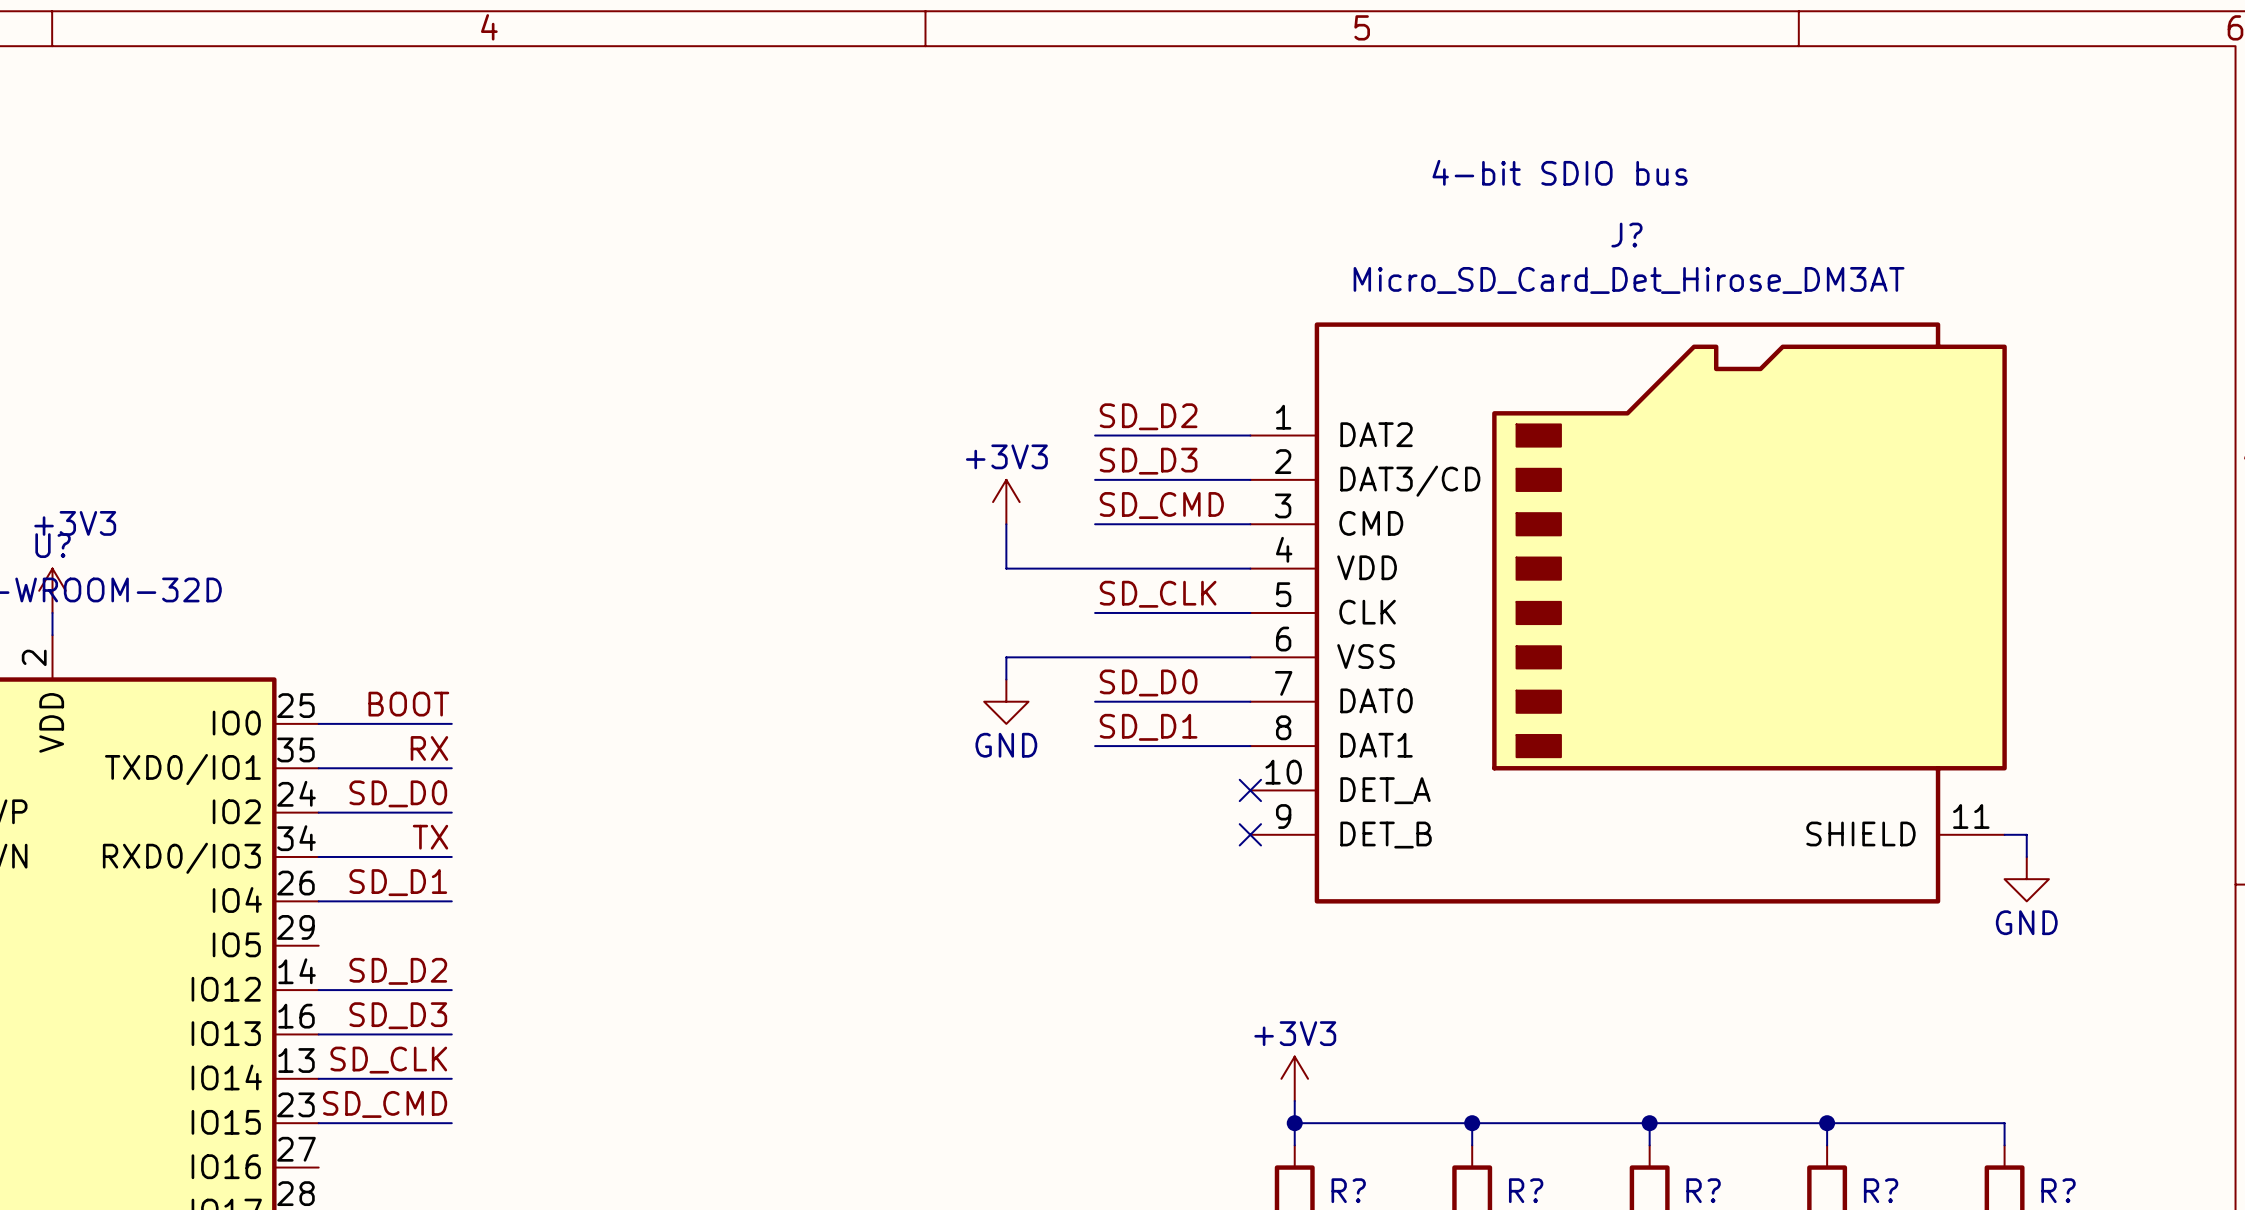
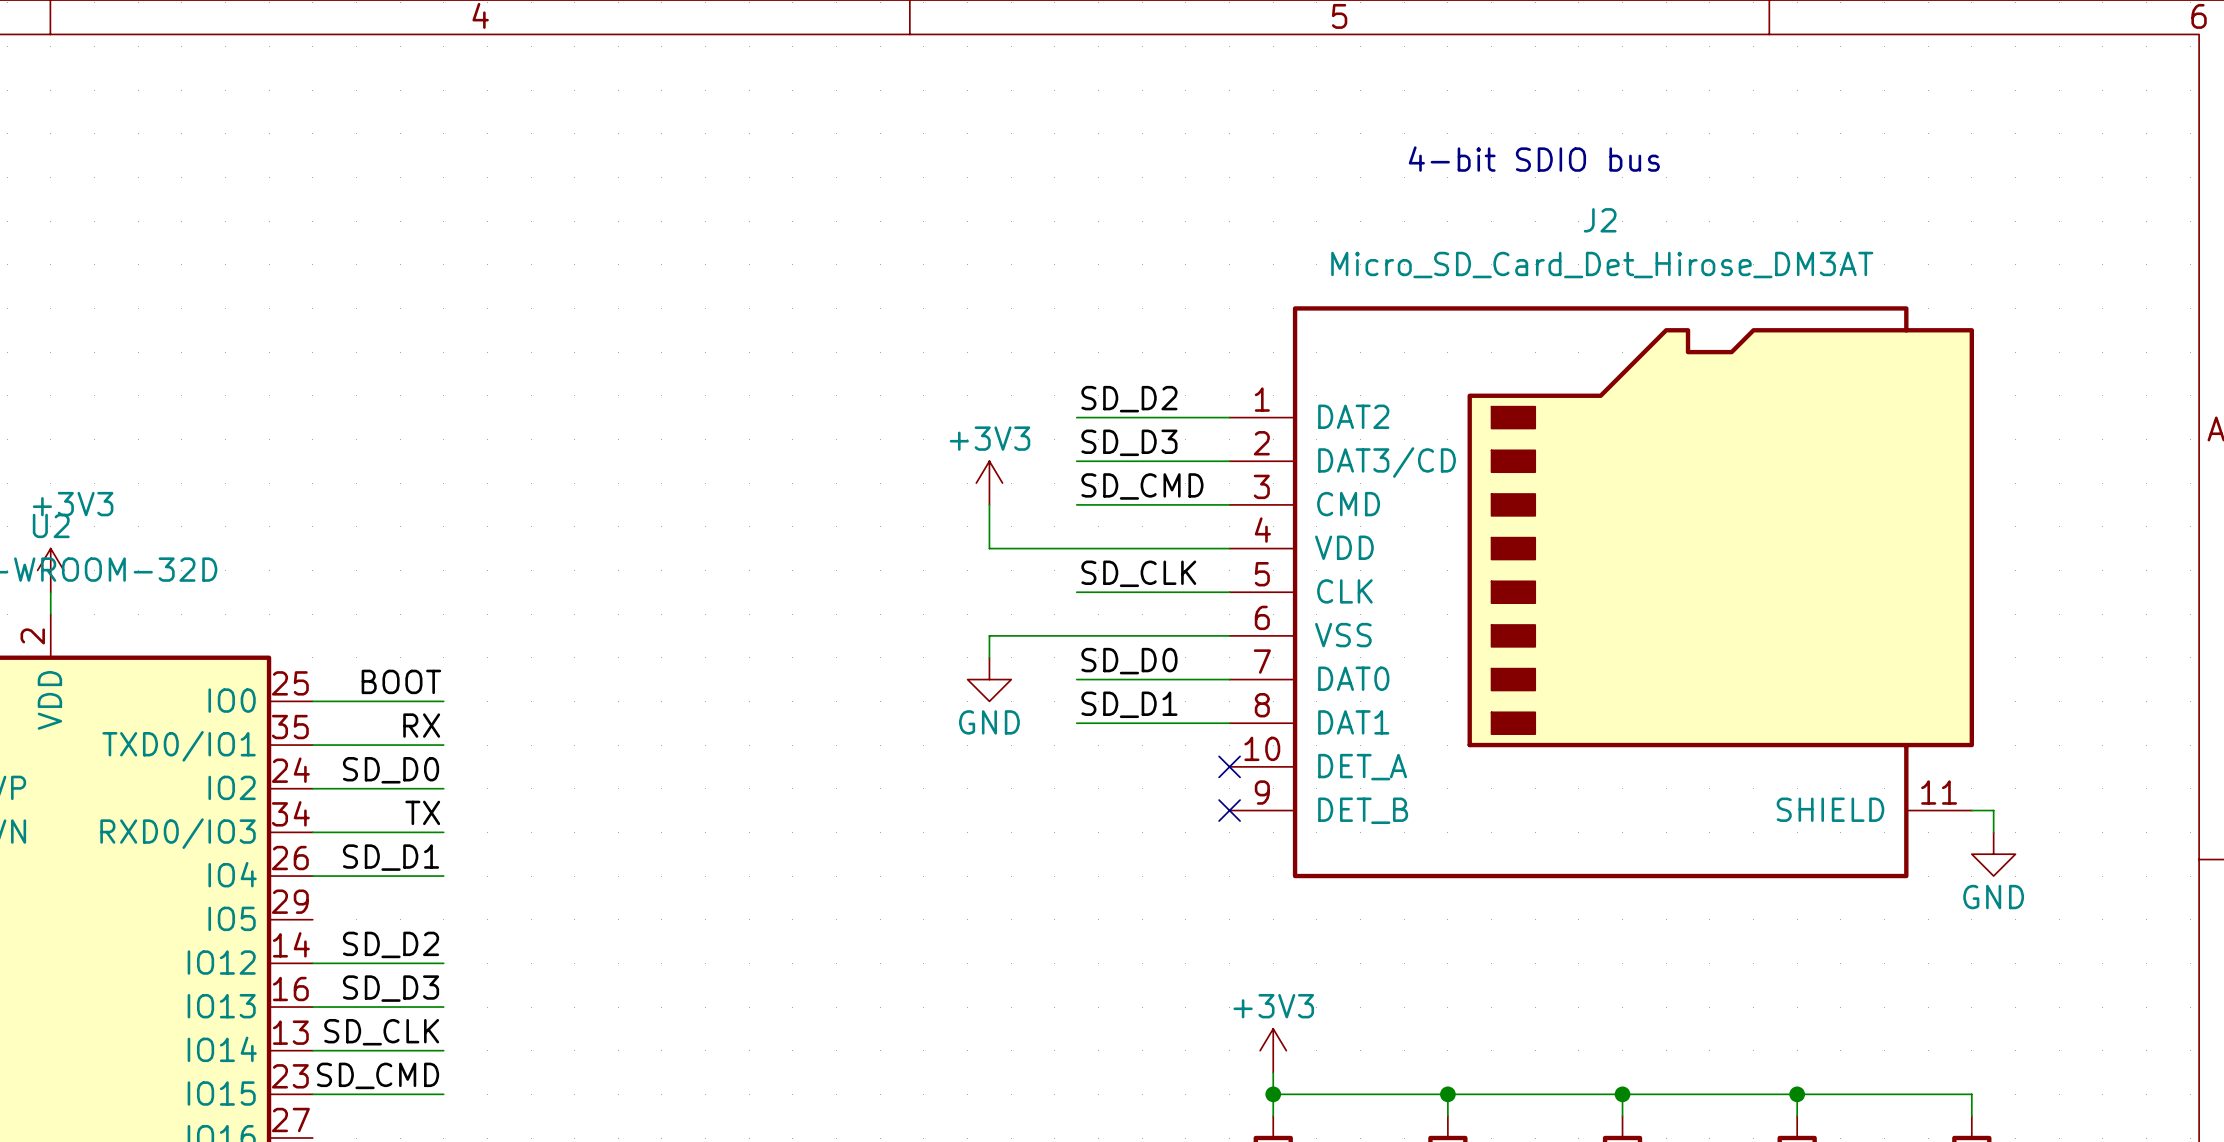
J? name: J? (1626, 235) -> J2 (1600, 220)
U? name: U? (53, 545) -> U2 (51, 525)

